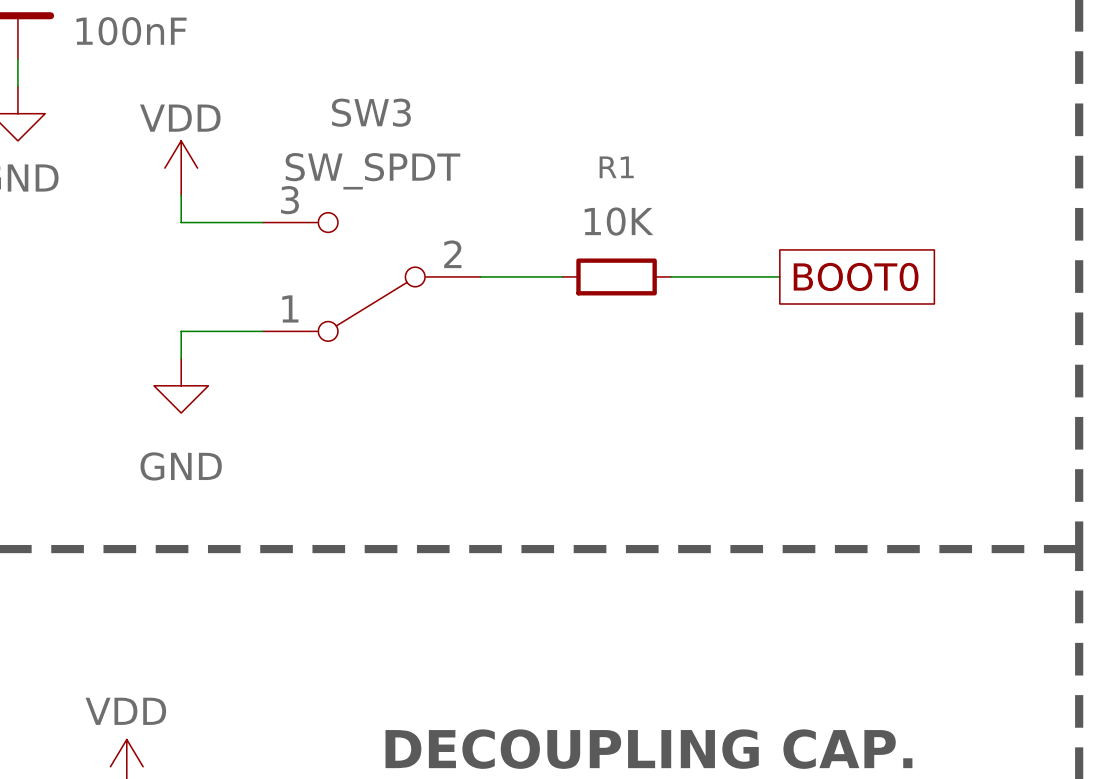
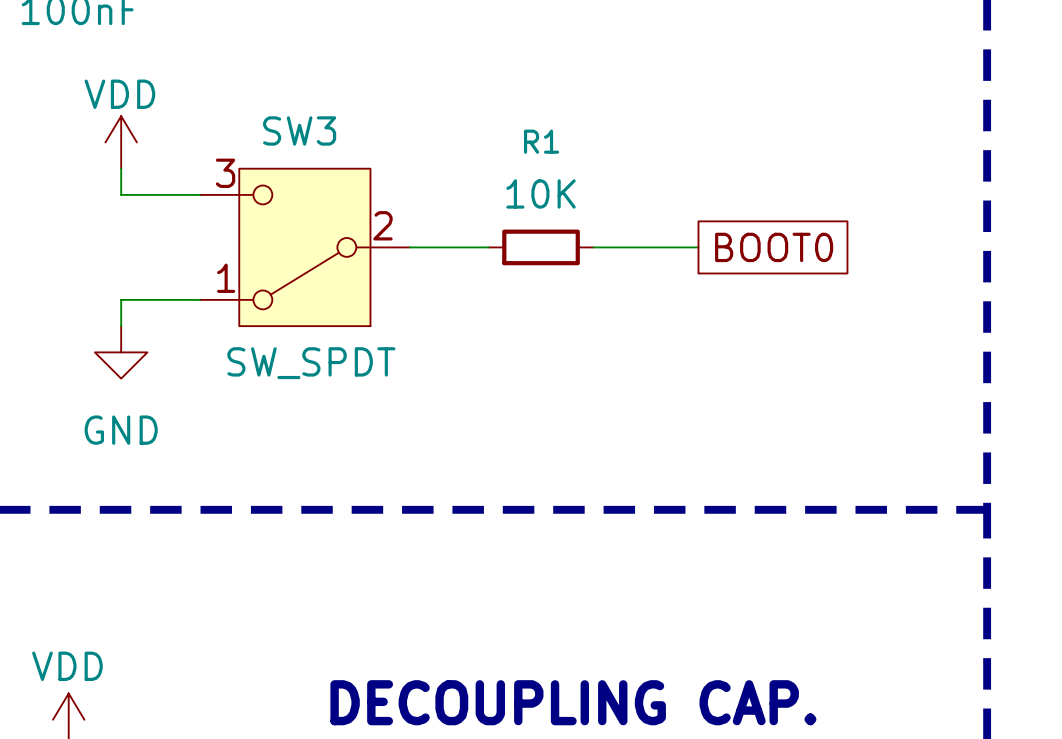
SW3 name position: SW3 (371, 112) -> SW3 (299, 130)
SW3 value position: SW_SPDT (372, 171) -> SW_SPDT (311, 363)
SW3 symbol: [262, 212, 481, 342] -> [199, 168, 410, 327]

